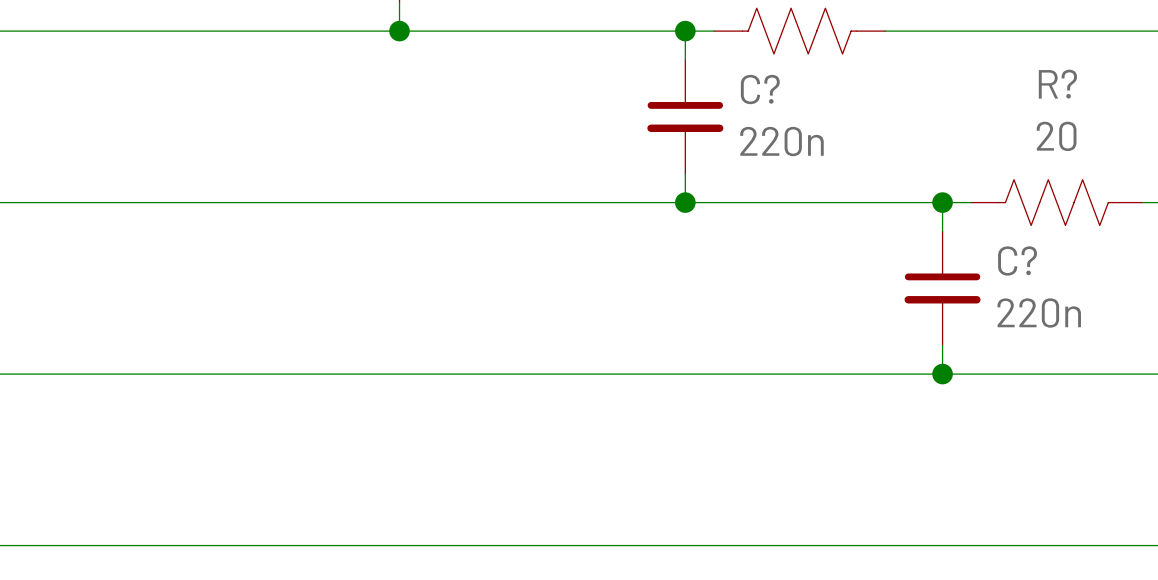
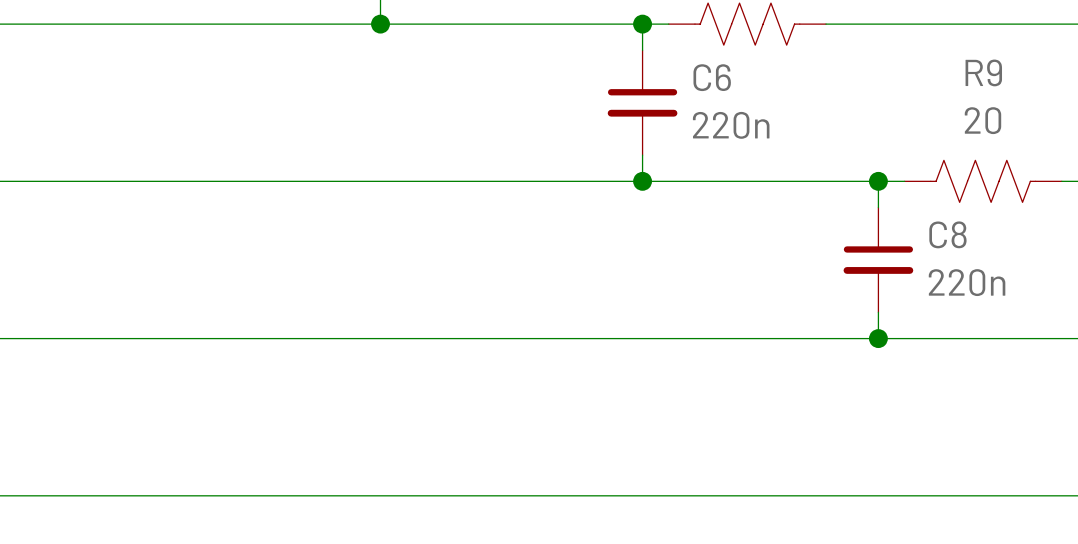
R? name: R? (1057, 84) -> R9 (983, 72)
C? name: C? (760, 89) -> C6 (712, 77)
C? name: C? (1017, 260) -> C8 (947, 234)

